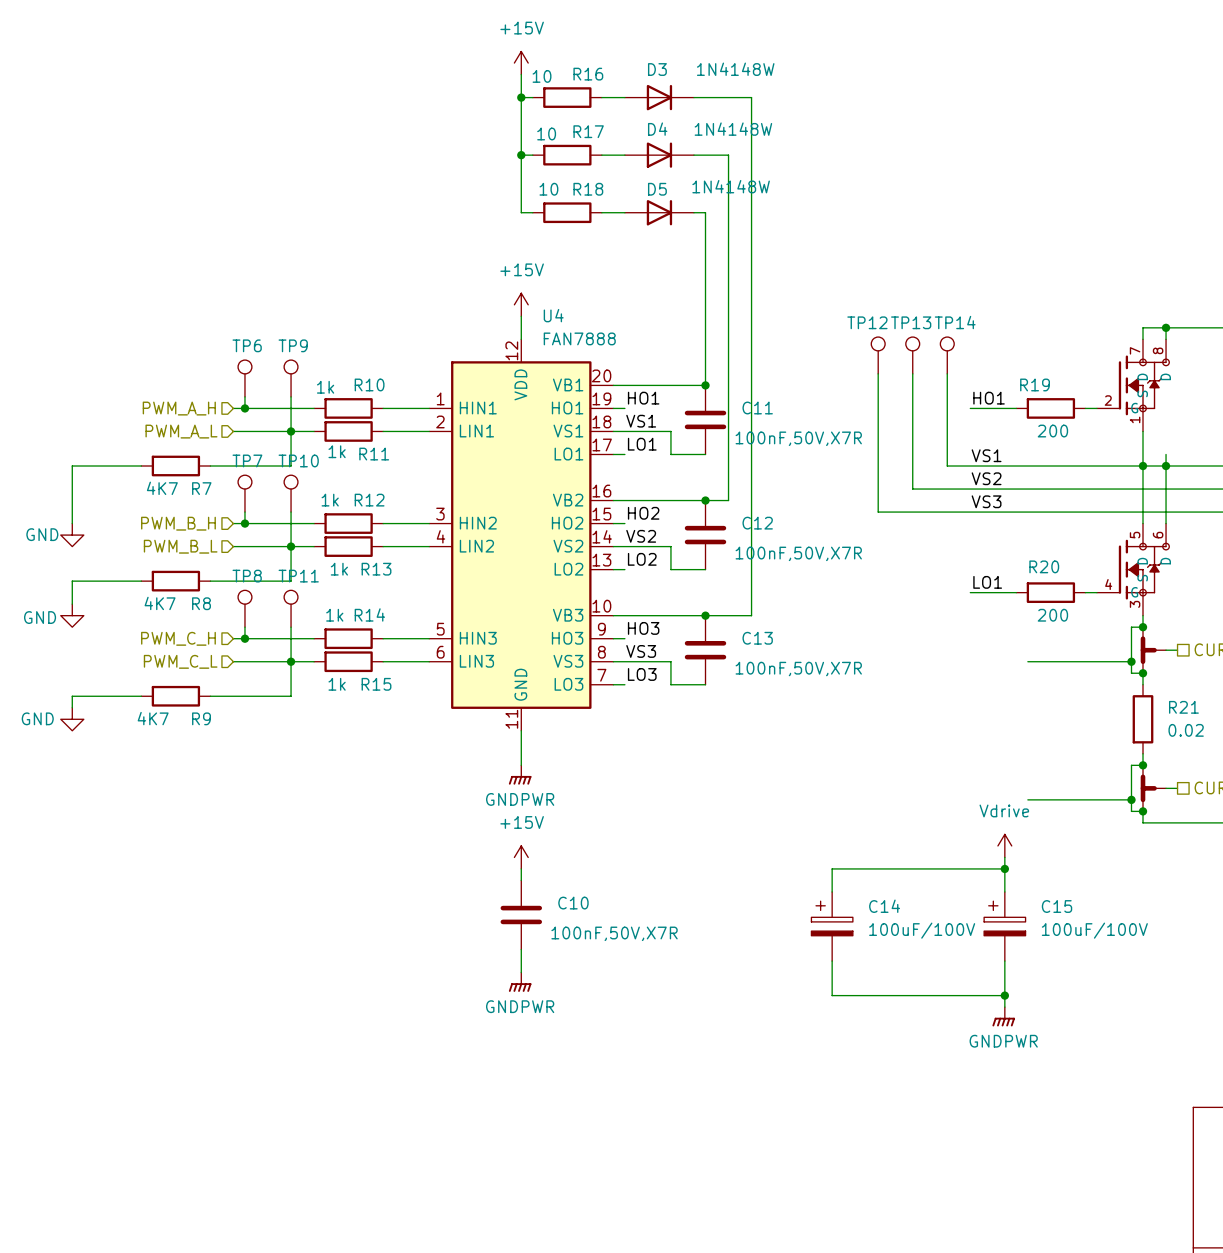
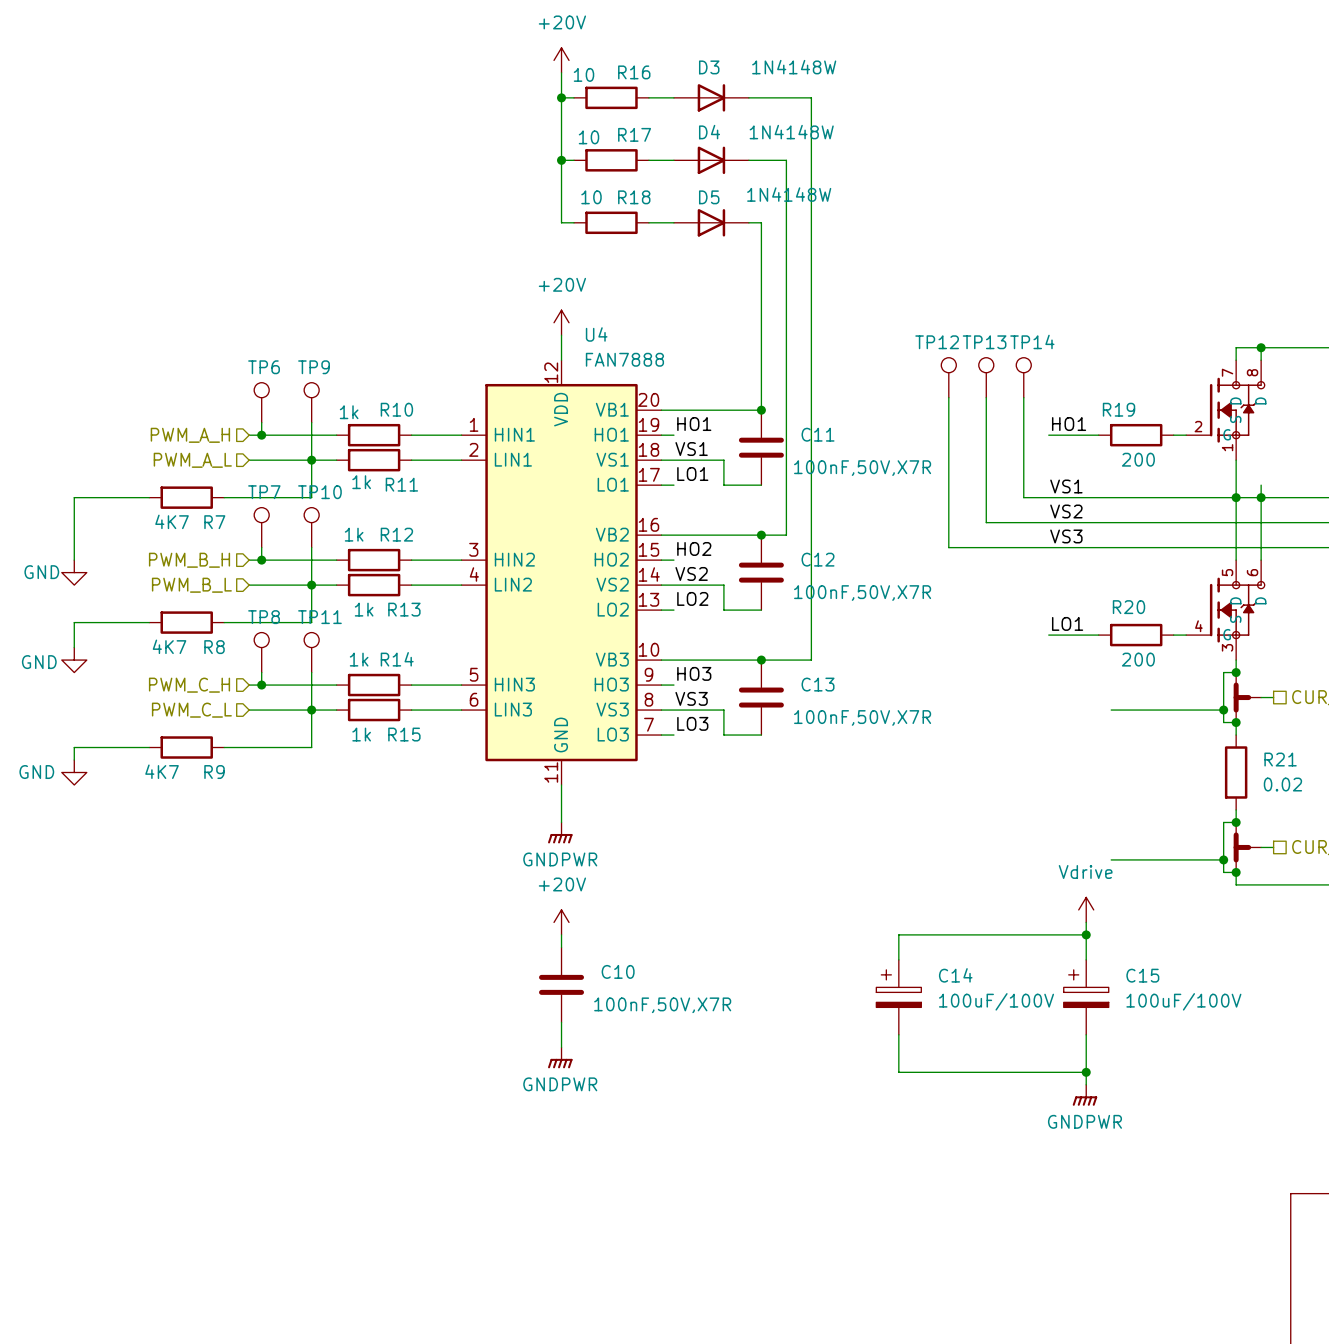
power symbol: +15V (521, 63) -> +20V (561, 60)
power symbol: +15V (521, 304) -> +20V (561, 322)
power symbol: +15V (521, 857) -> +20V (561, 922)

